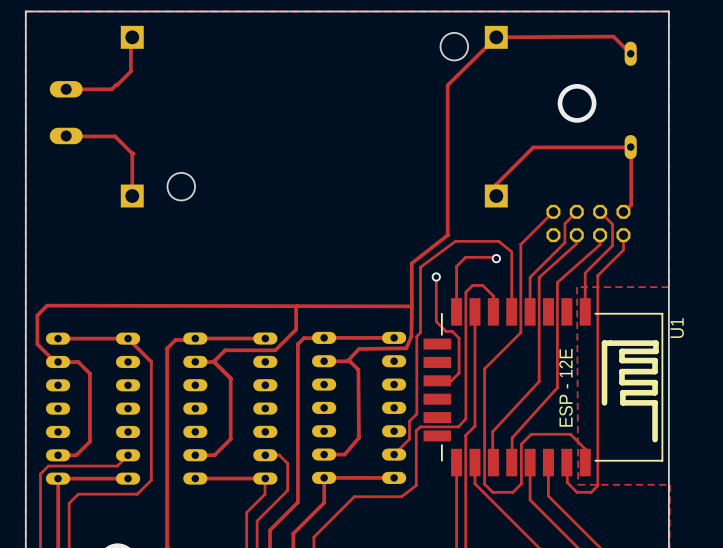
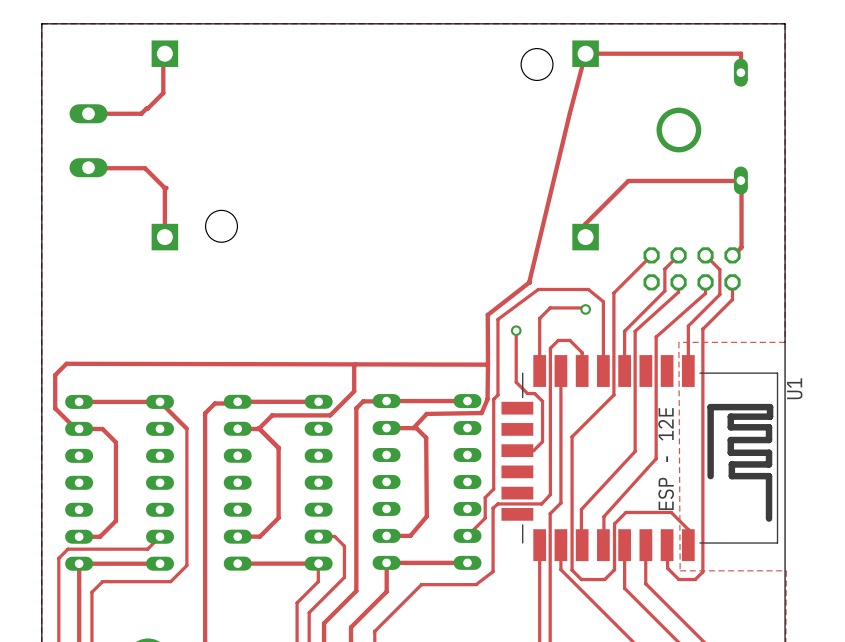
track: (630, 53) (613, 36) (496, 37) (447, 85) (447, 234) -> (740, 72) (741, 53) (585, 53) (529, 281)

